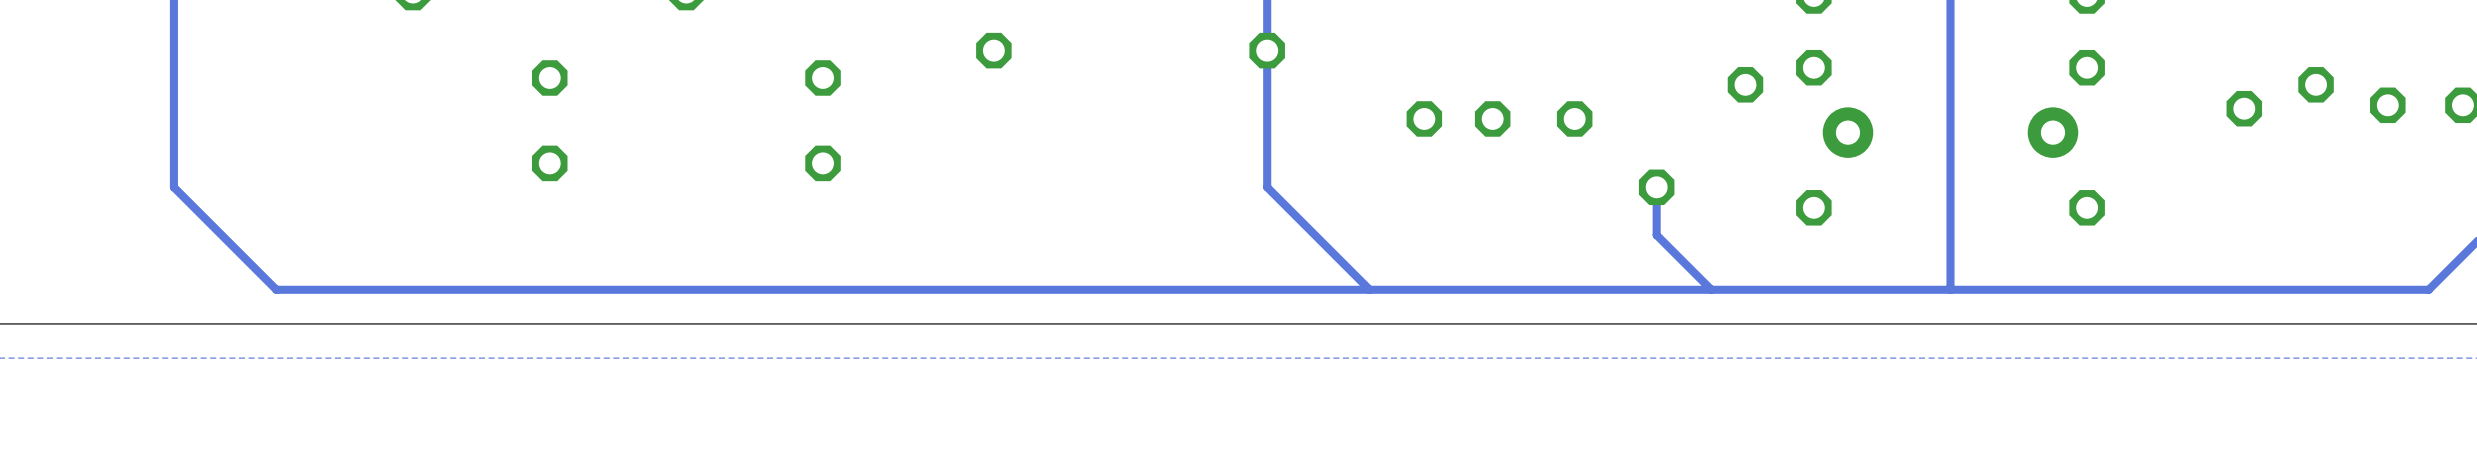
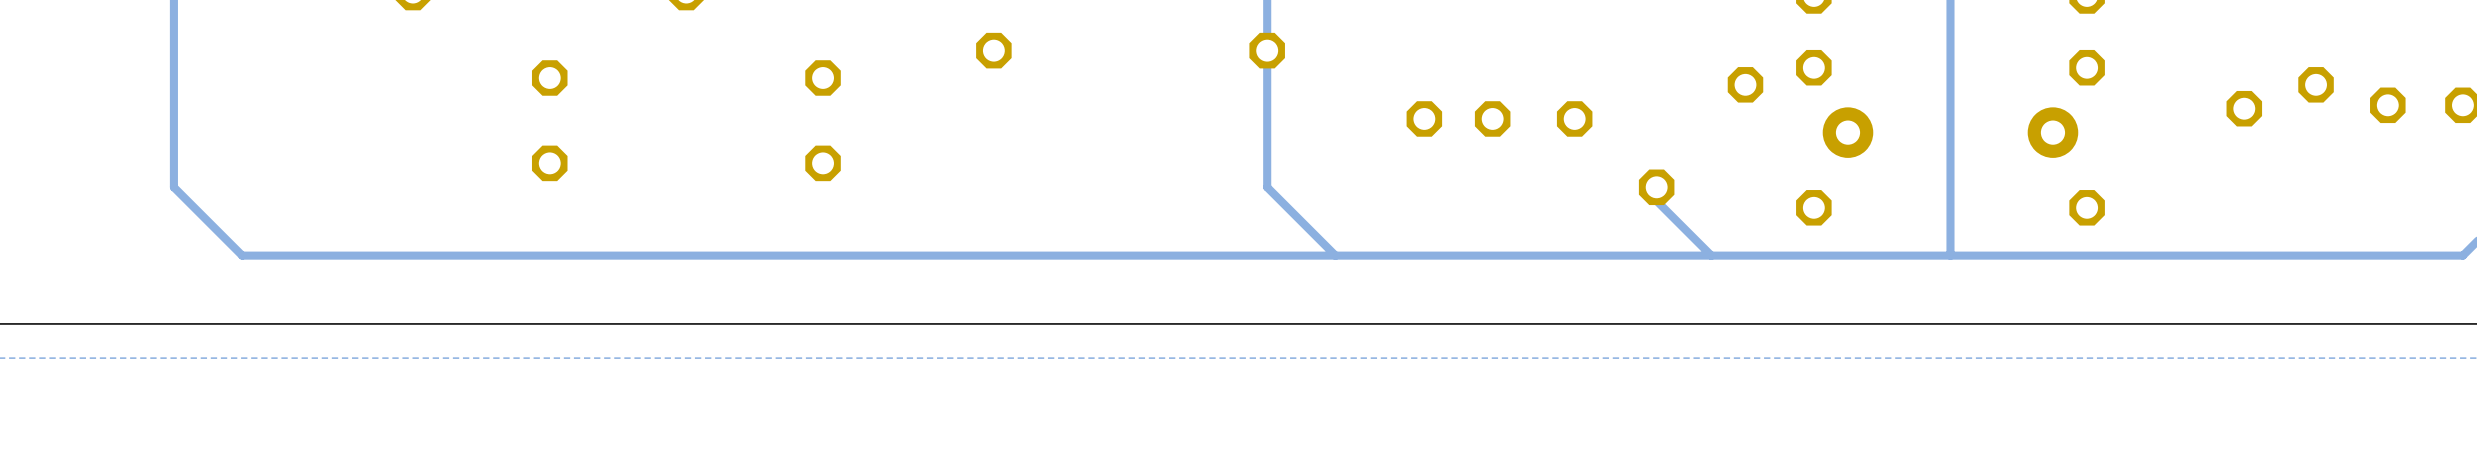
track: (1656, 200) (1656, 235) (1711, 289) -> (1656, 200) (1711, 255)
track: (1335, 255) (1369, 289) -> none
track: (1950, 255) (1950, 289) -> none
track: (2462, 255) (2428, 289) (276, 289) (242, 255) -> (2462, 255) (242, 255)

